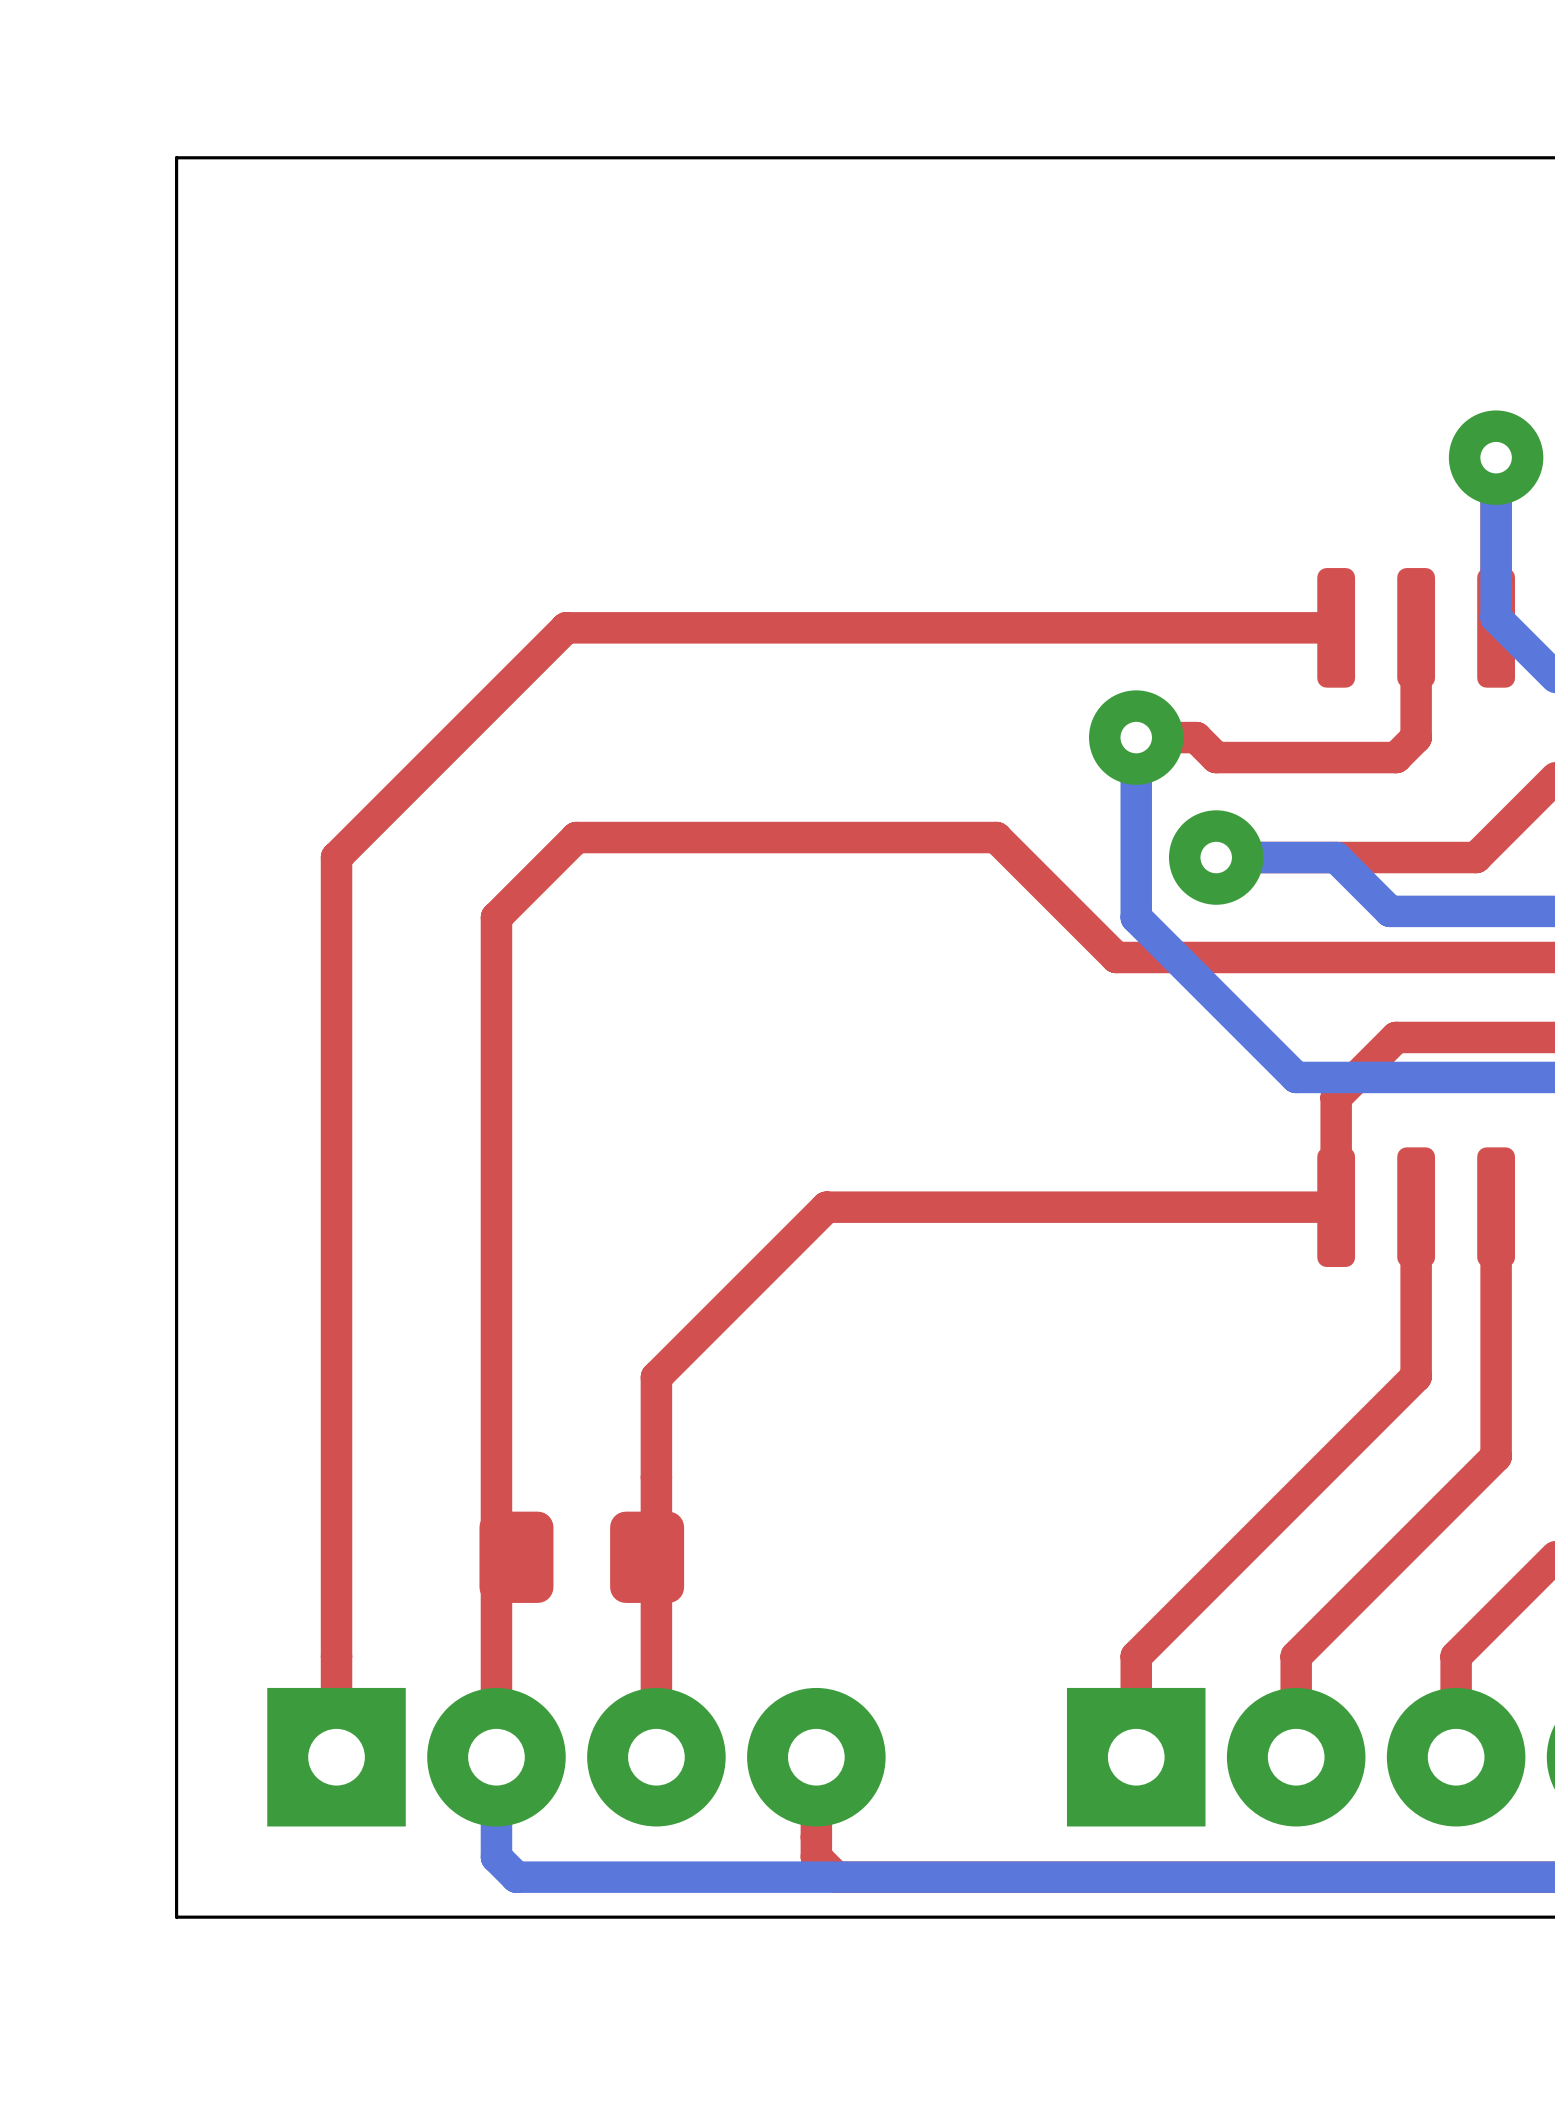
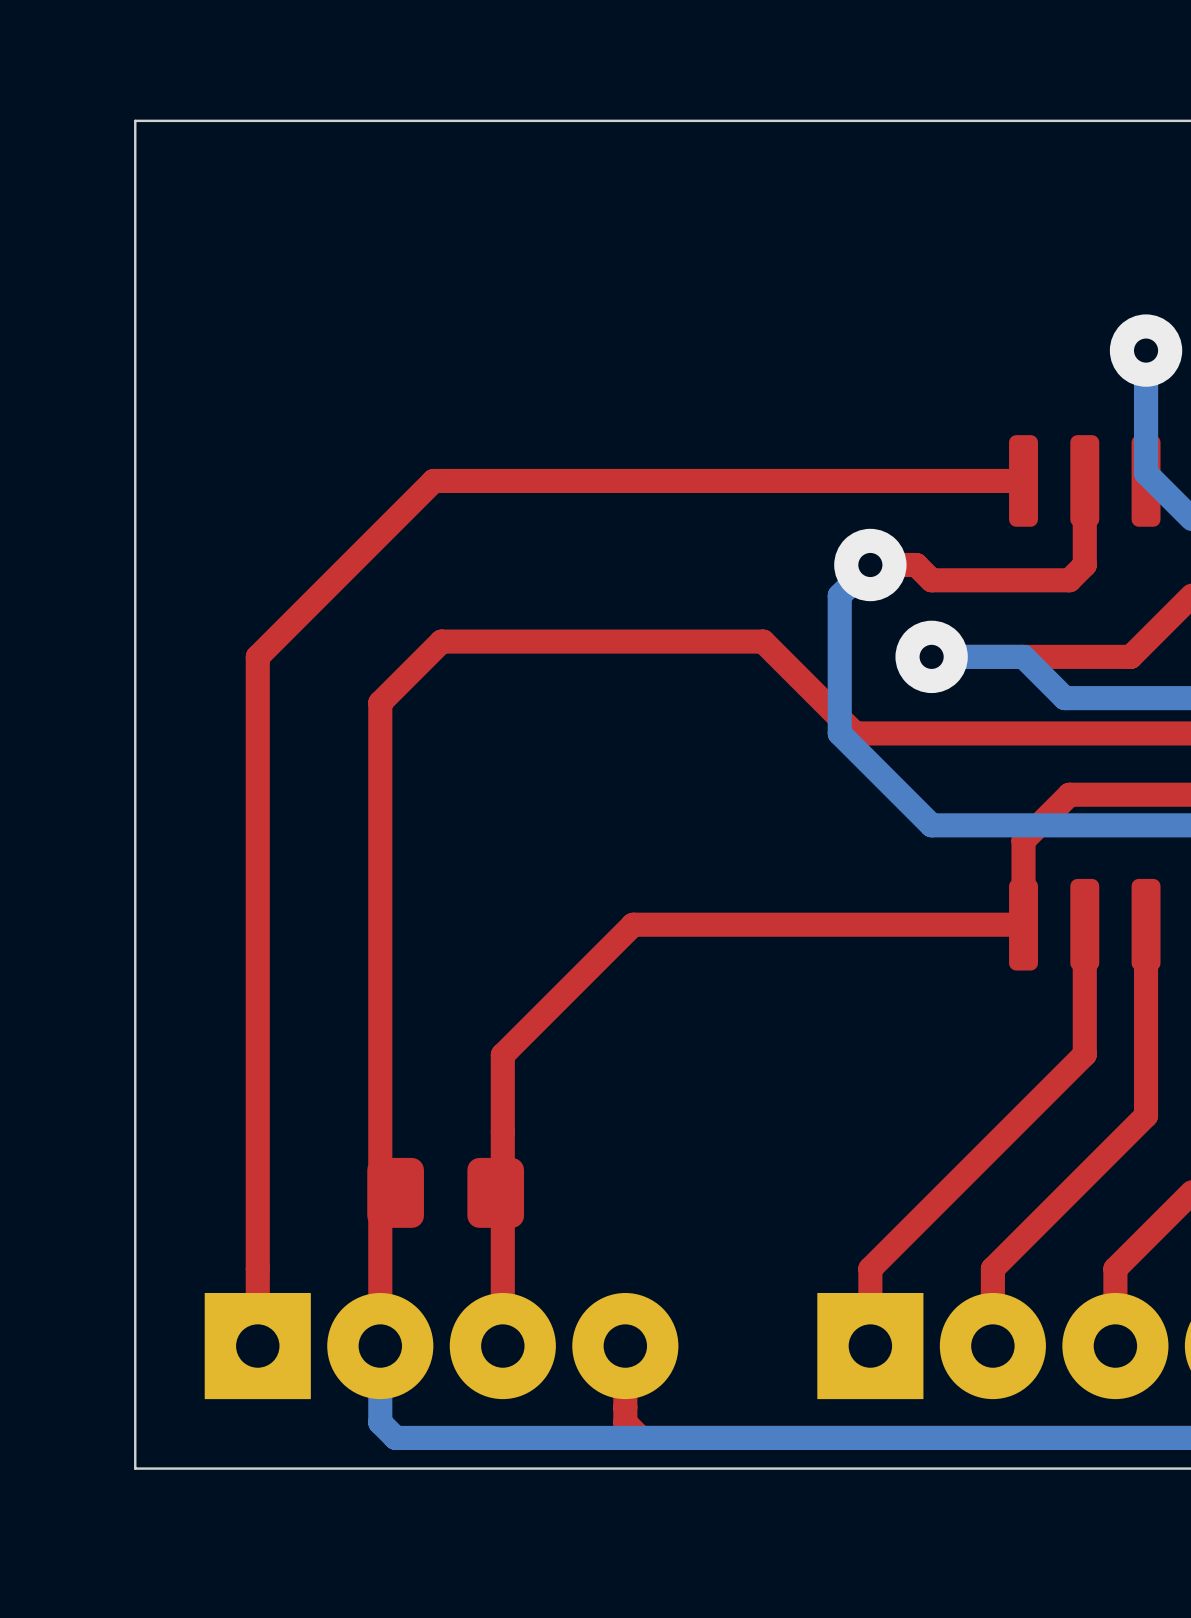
bottom track: (1136, 737) (1136, 917) (1296, 1077) -> (870, 564) (839, 595) (839, 733) (931, 825) (992, 825)

